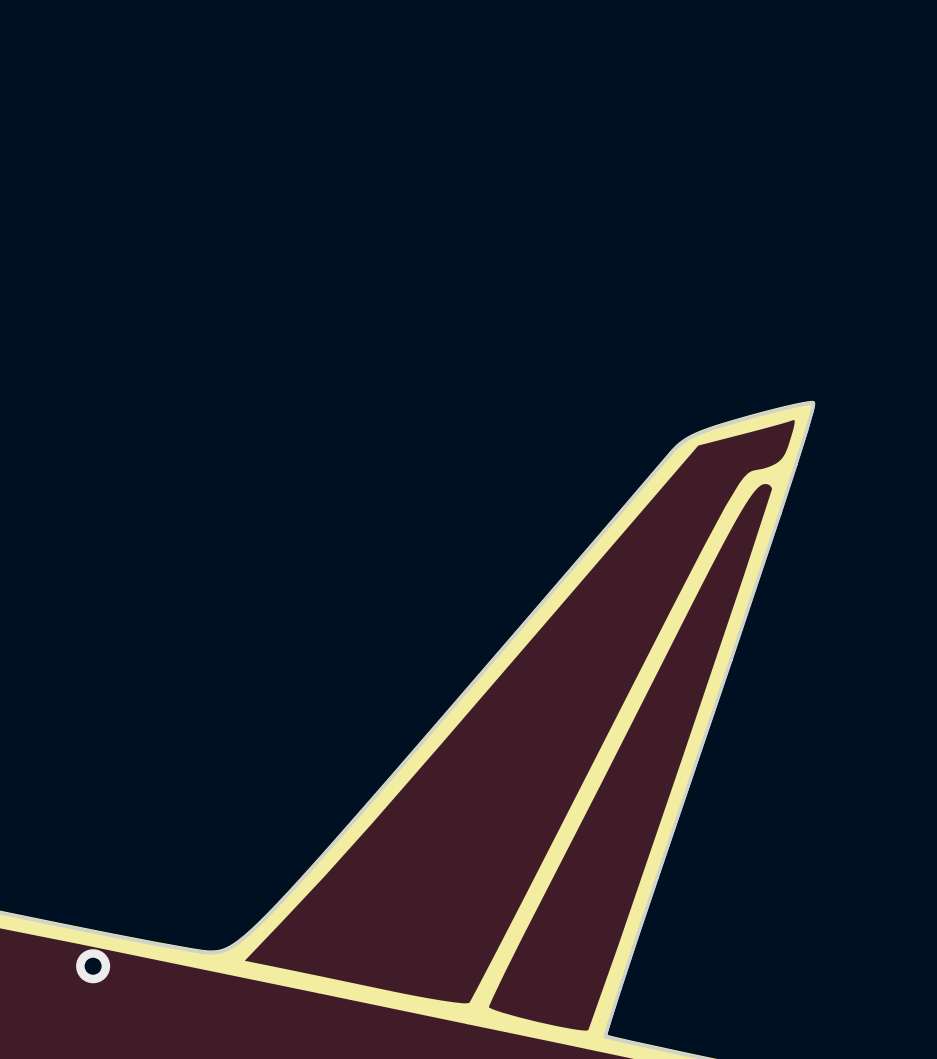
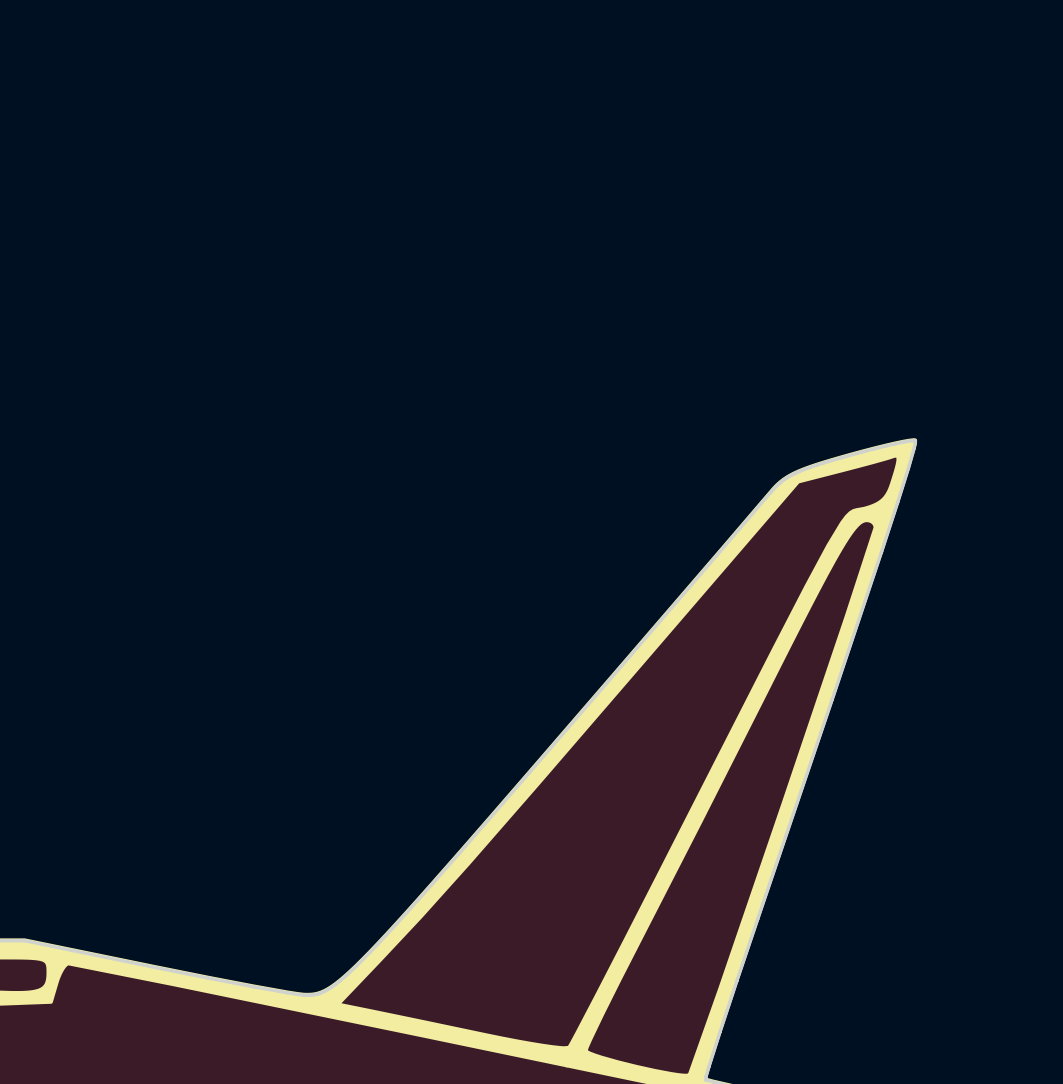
via: (93, 966) -> none

